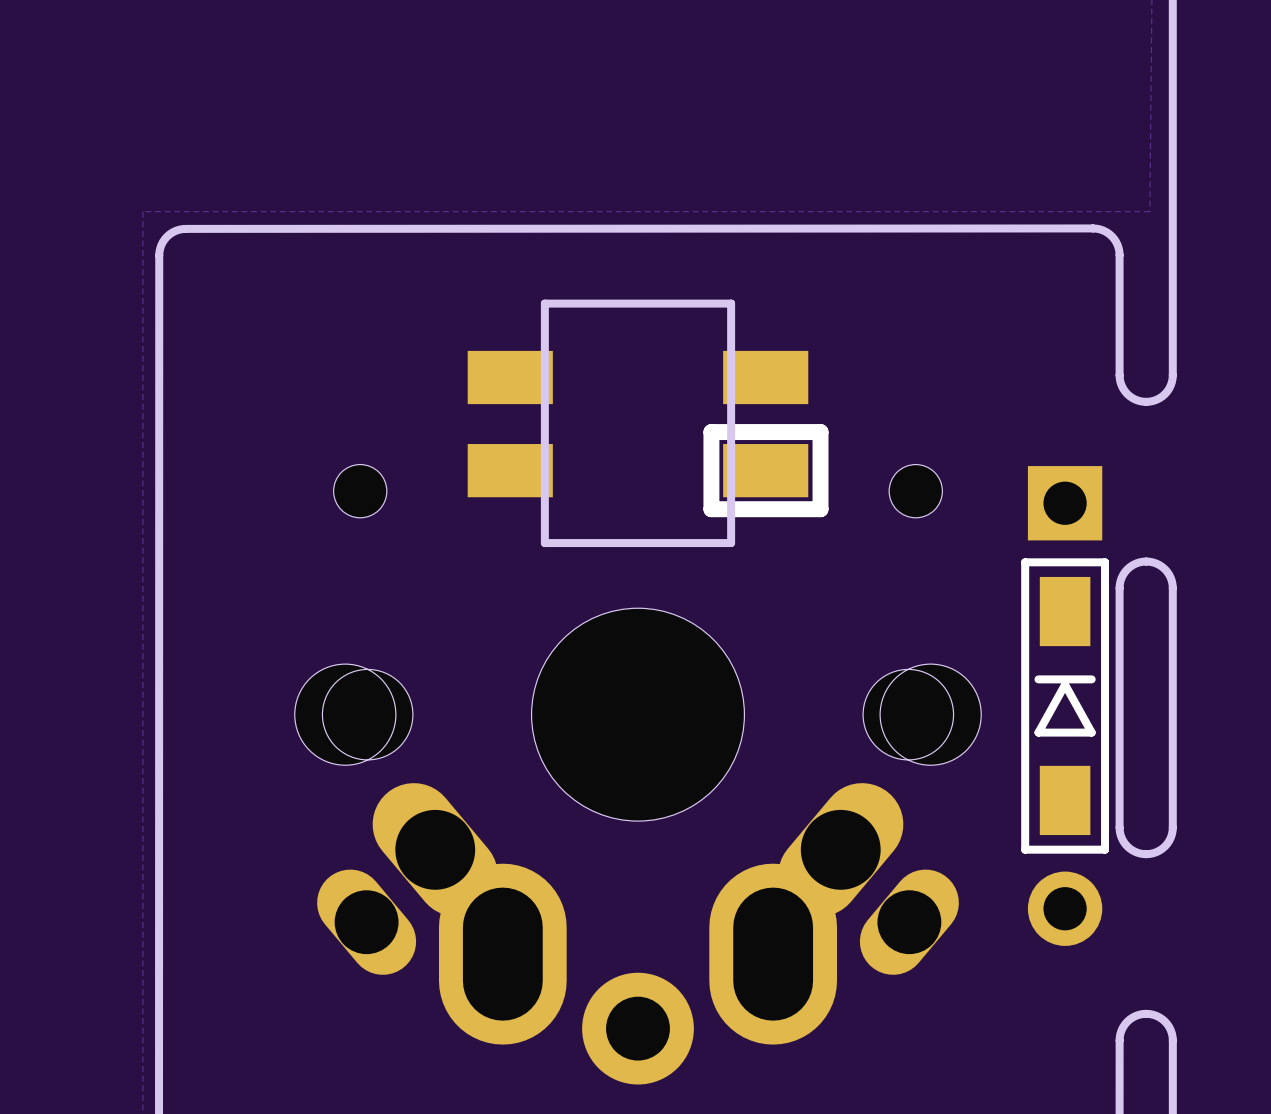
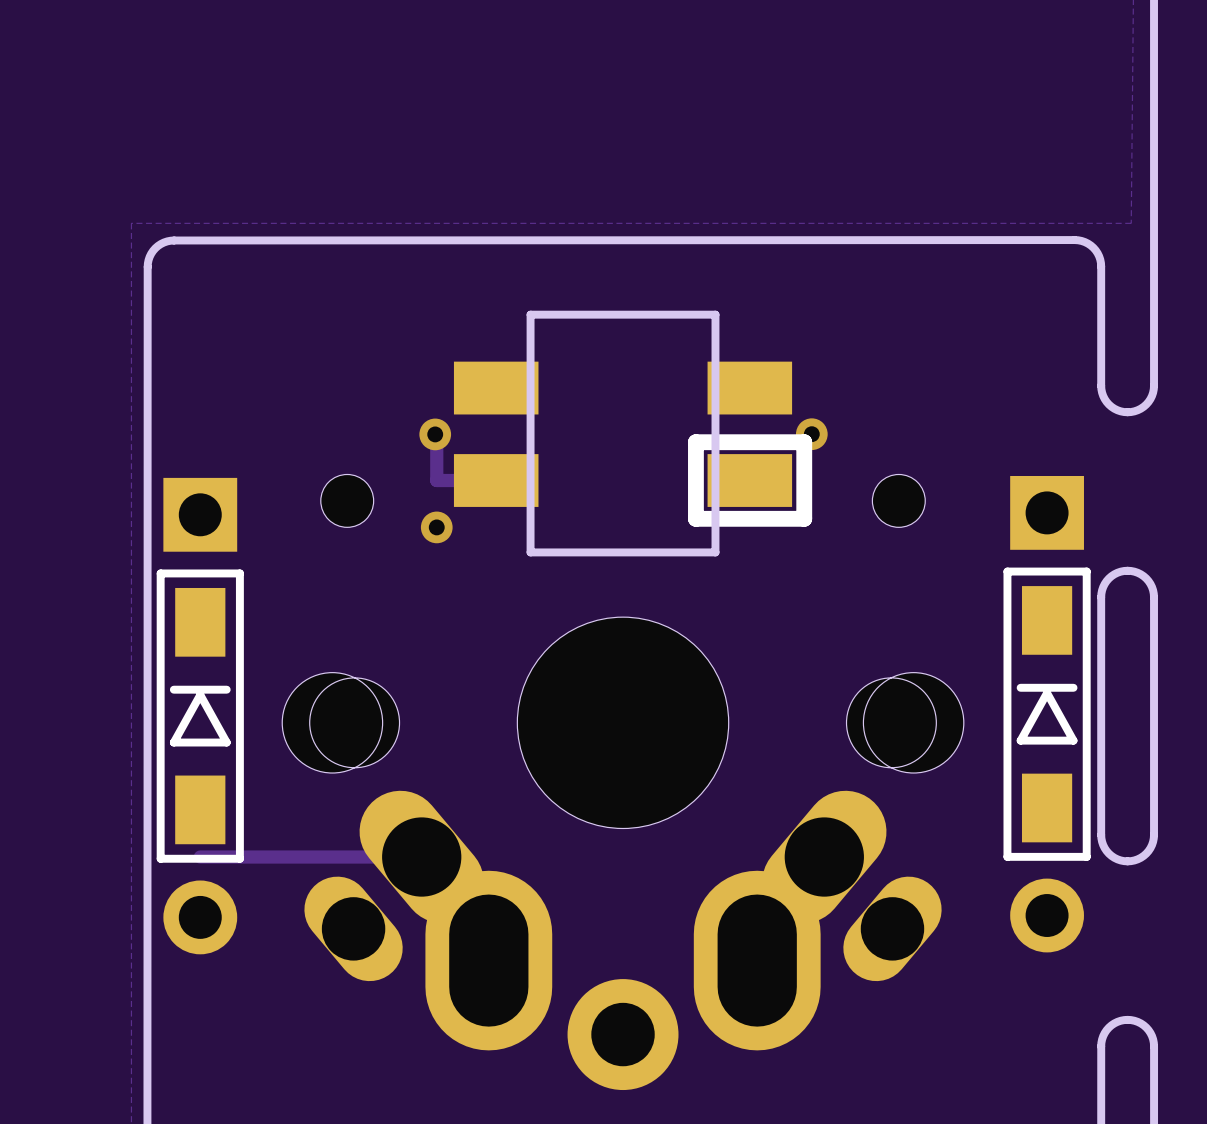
via: none -> (811, 434)
track: none -> (435, 434) (436, 480) (496, 480)
via: none -> (435, 434)
via: none -> (436, 527)
part: none -> (200, 716)
track: none -> (200, 857) (421, 857)

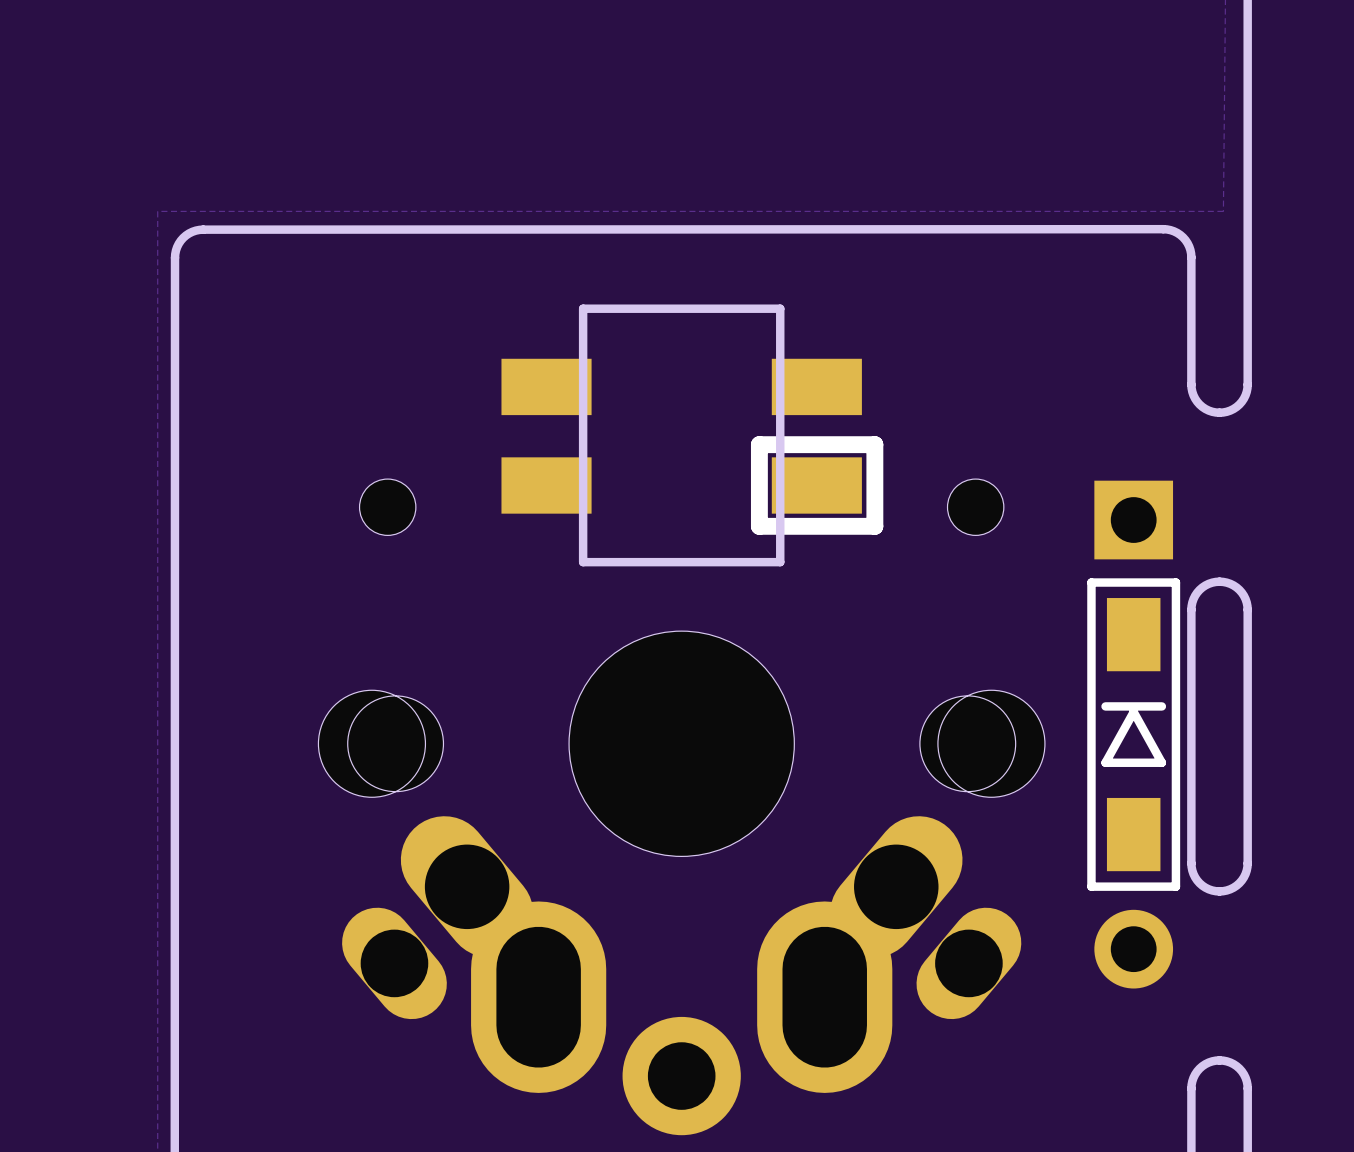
track: (435, 434) (436, 480) (496, 480) -> none
via: (435, 434) -> none
via: (811, 434) -> none
via: (436, 527) -> none
part: (200, 716) -> none
track: (200, 857) (421, 857) -> none

